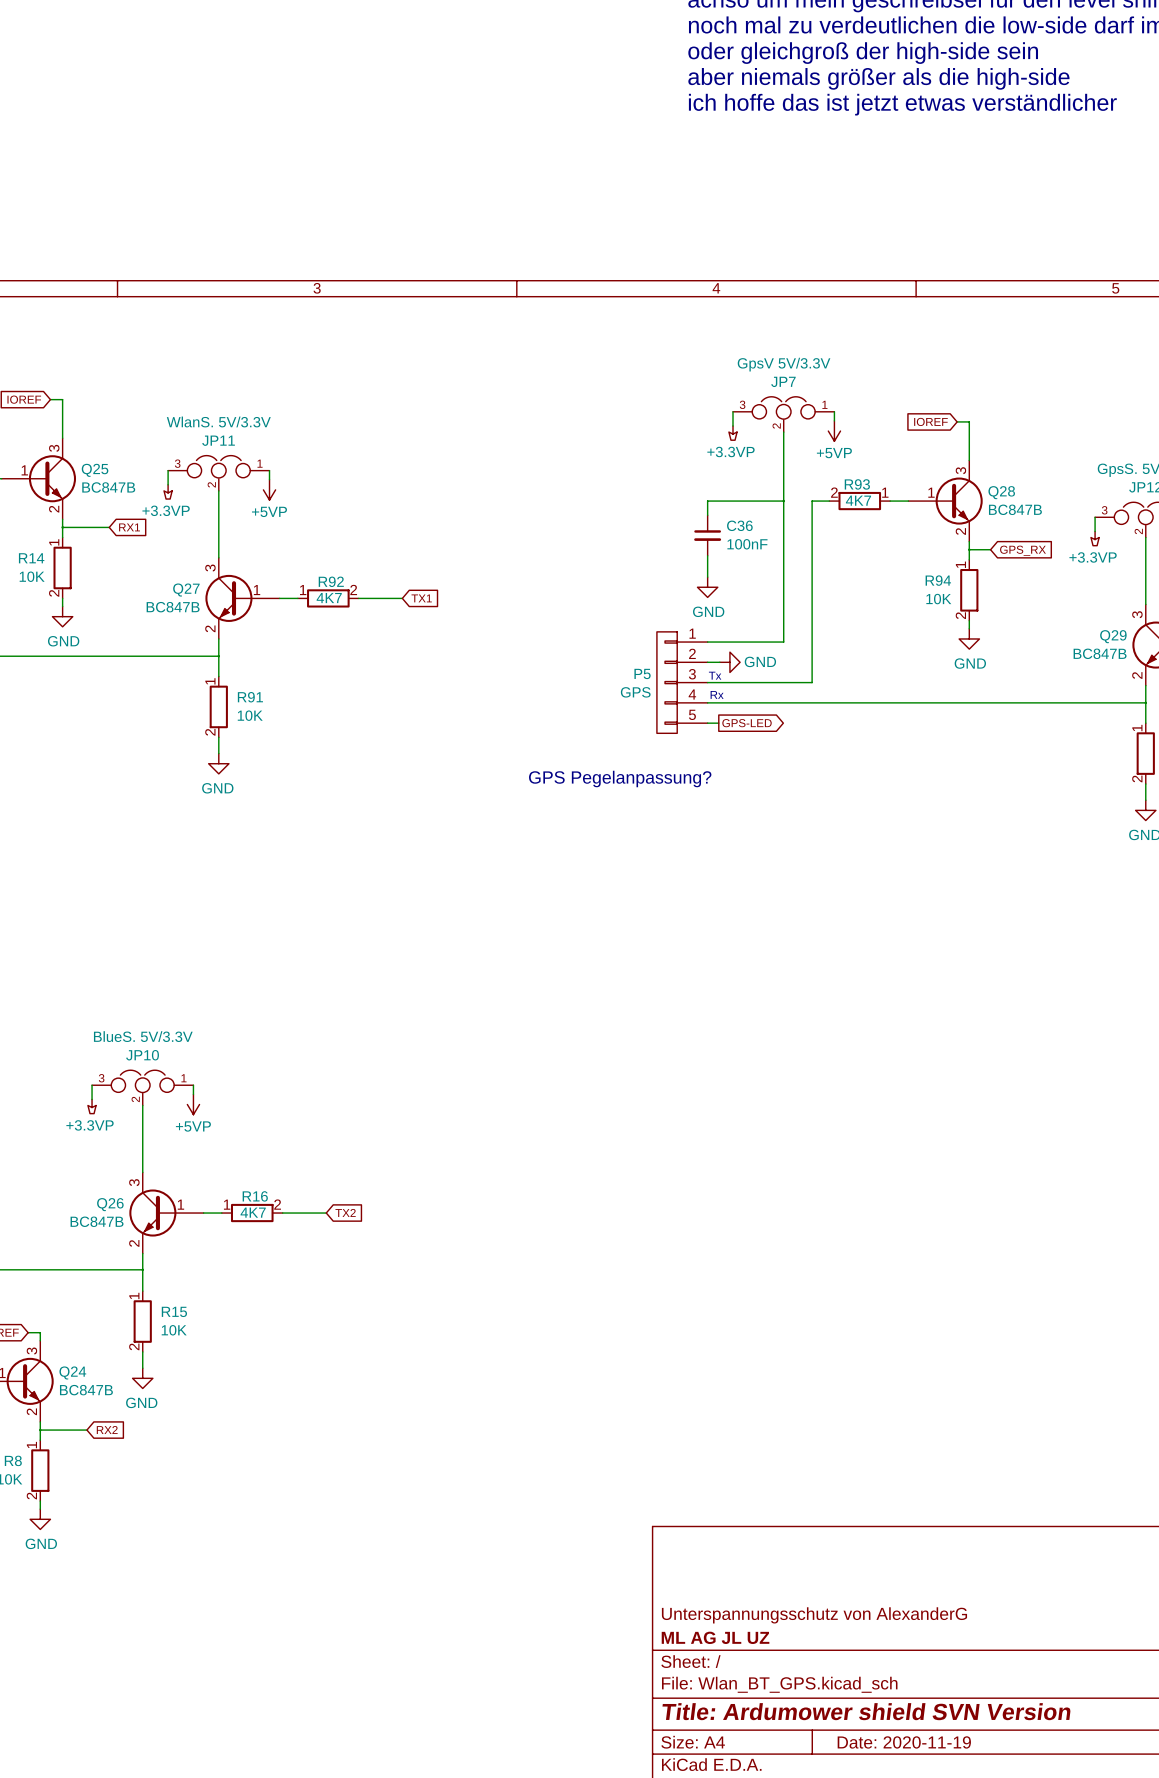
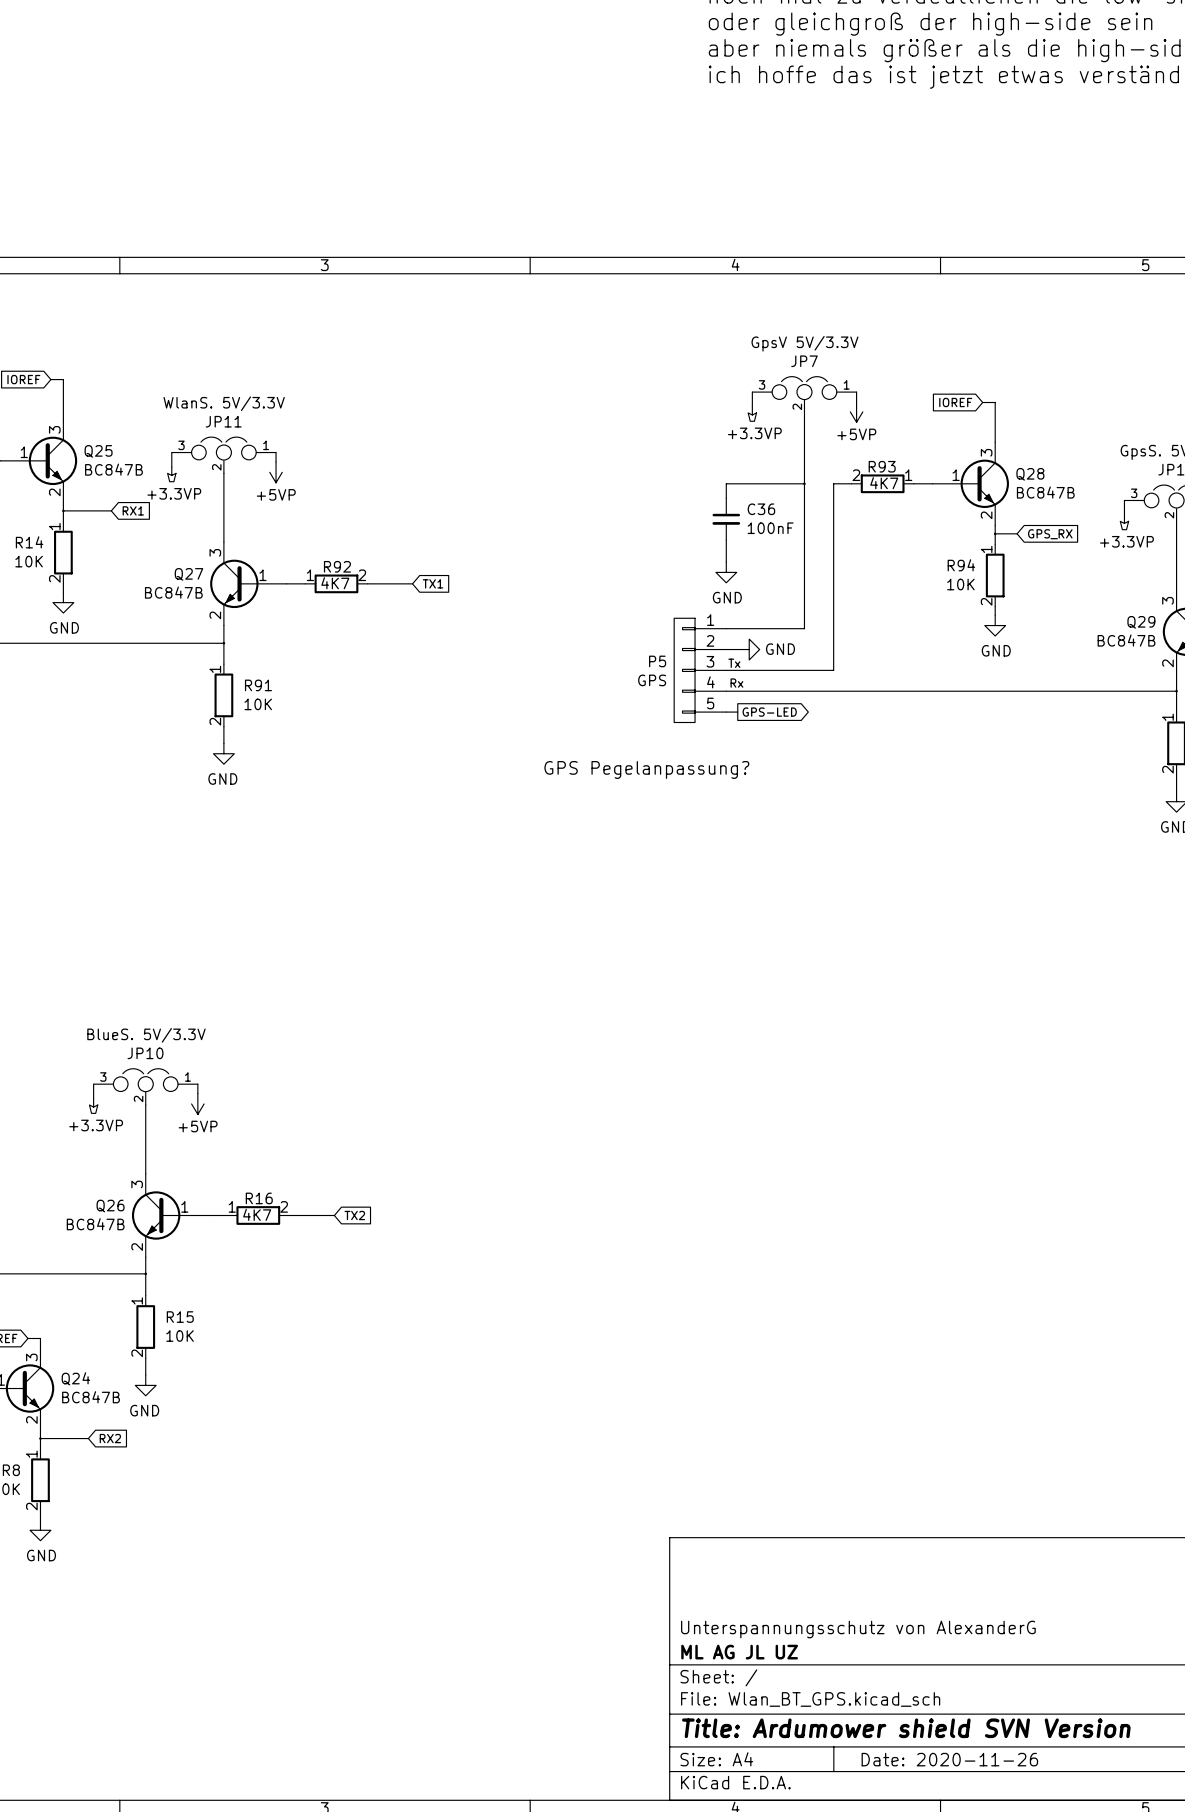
title block: Date: 2020-11-19 (904, 1742) -> Date: 2020-11-26 (949, 1759)

